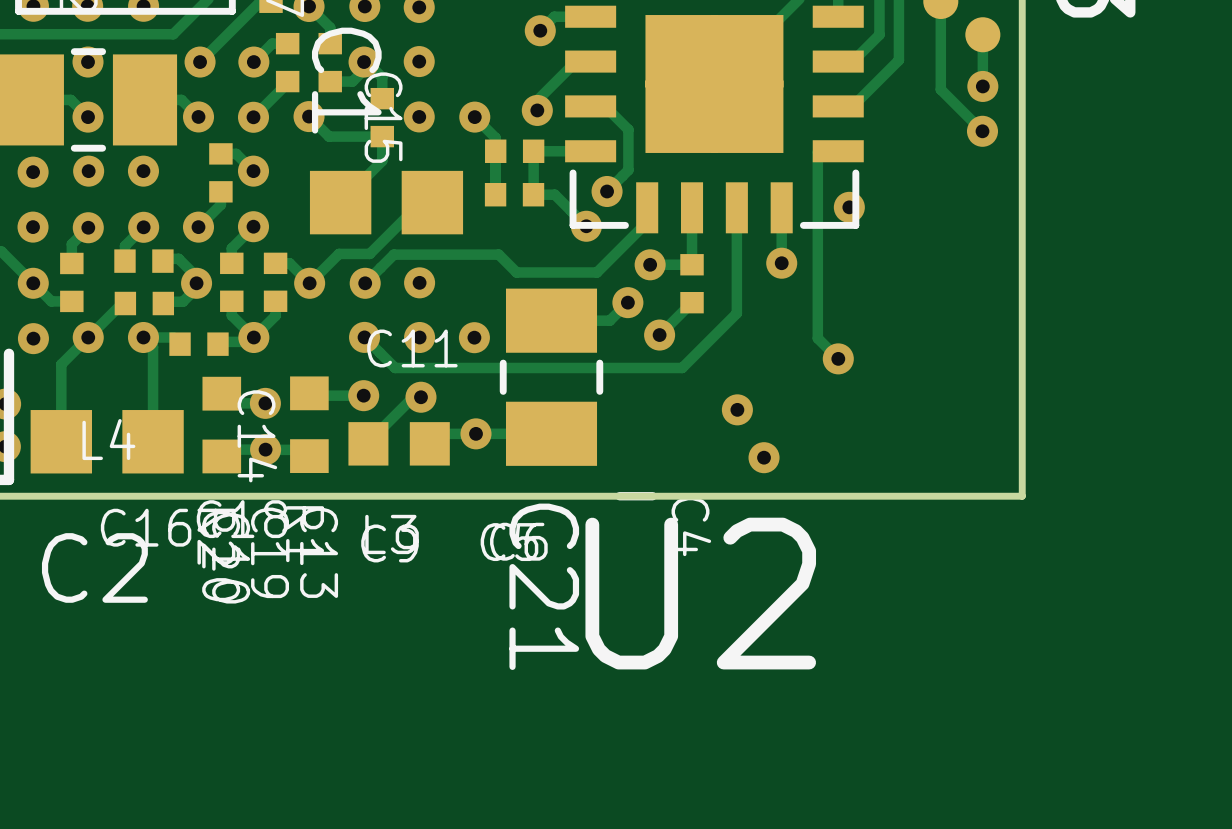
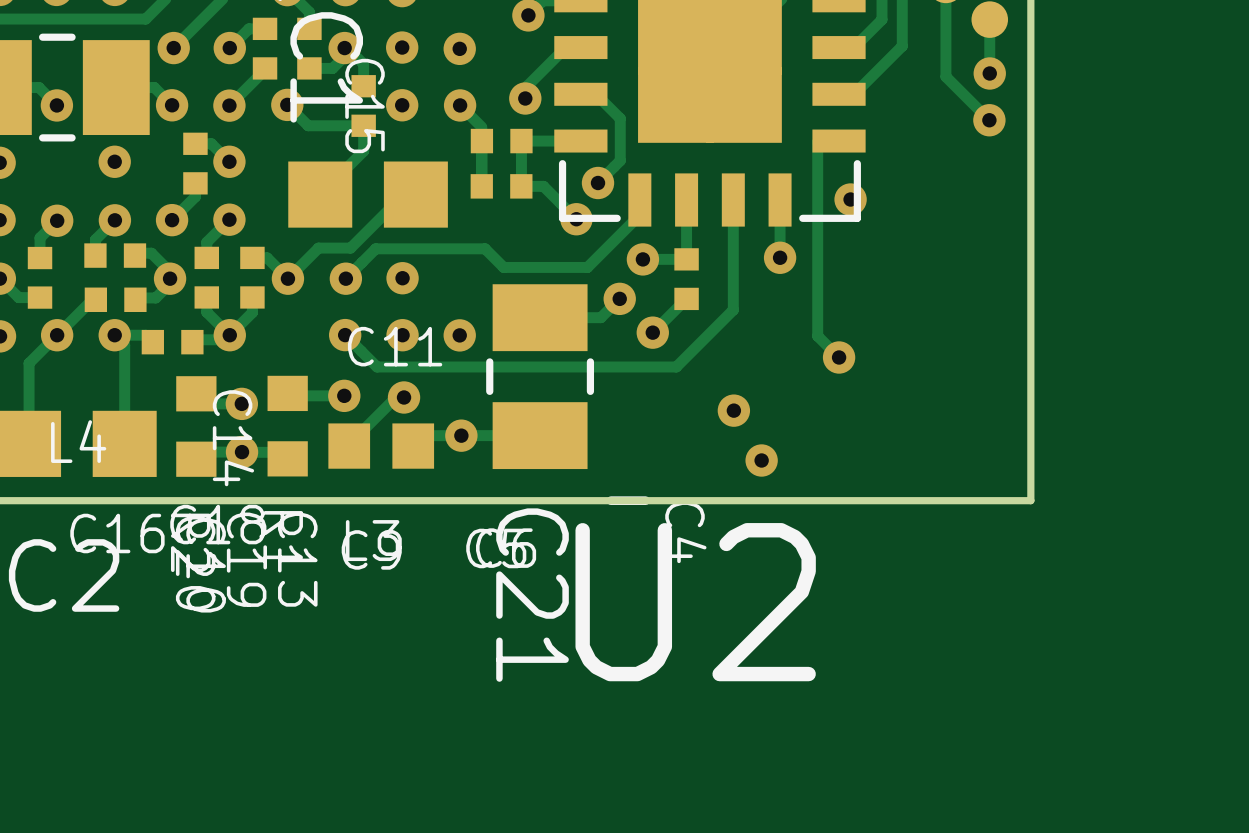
via: (88, 62) -> none
via: none -> (459, 48)
via: (88, 171) -> none

